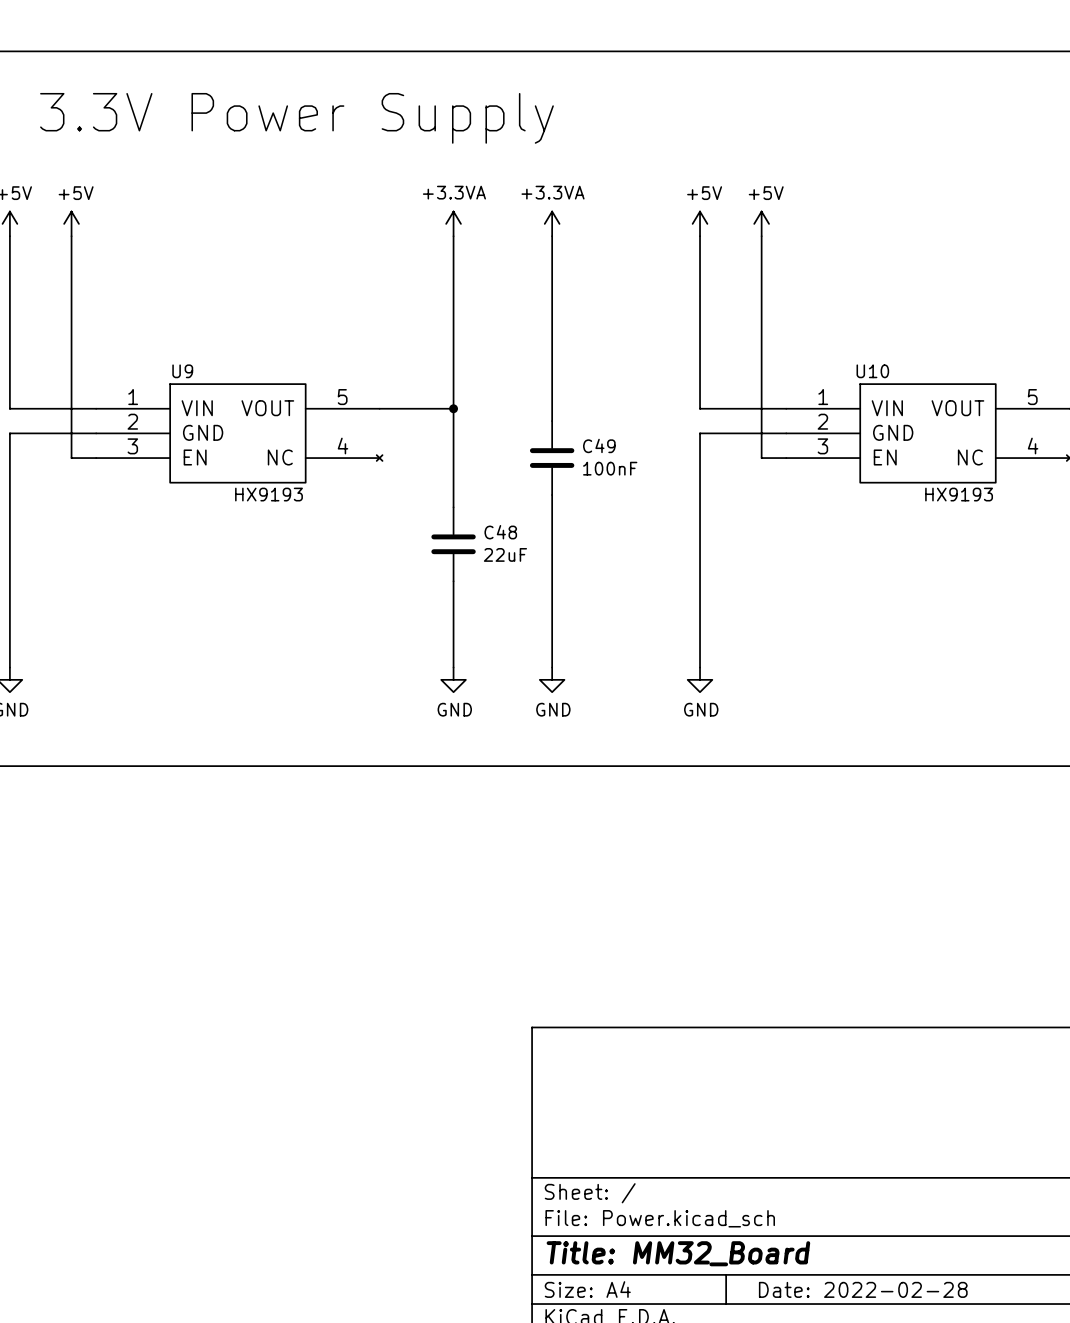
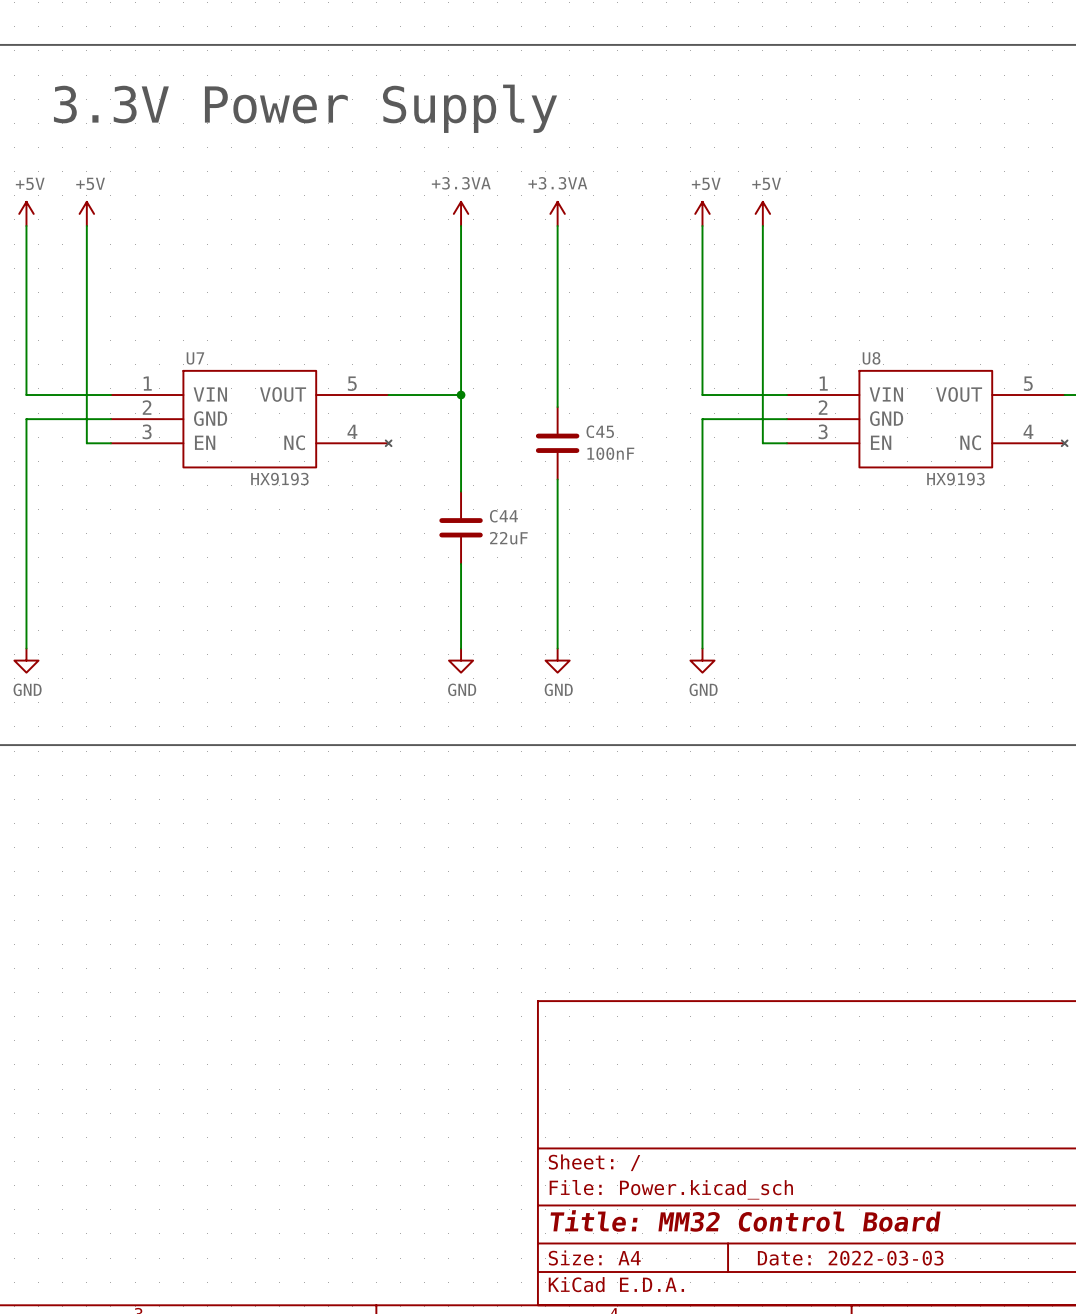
U9 name: U9 (182, 371) -> U7 (195, 358)
U10 name: U10 (872, 371) -> U8 (871, 358)
C49 name: C49 (599, 445) -> C45 (600, 431)
C48 name: C48 (500, 532) -> C44 (503, 516)
title block: Title: MM32_Board (678, 1253) -> Title: MM32 Control Board (745, 1220)
title block: Date: 2022-02-28 (863, 1289) -> Date: 2022-03-03 (850, 1258)

